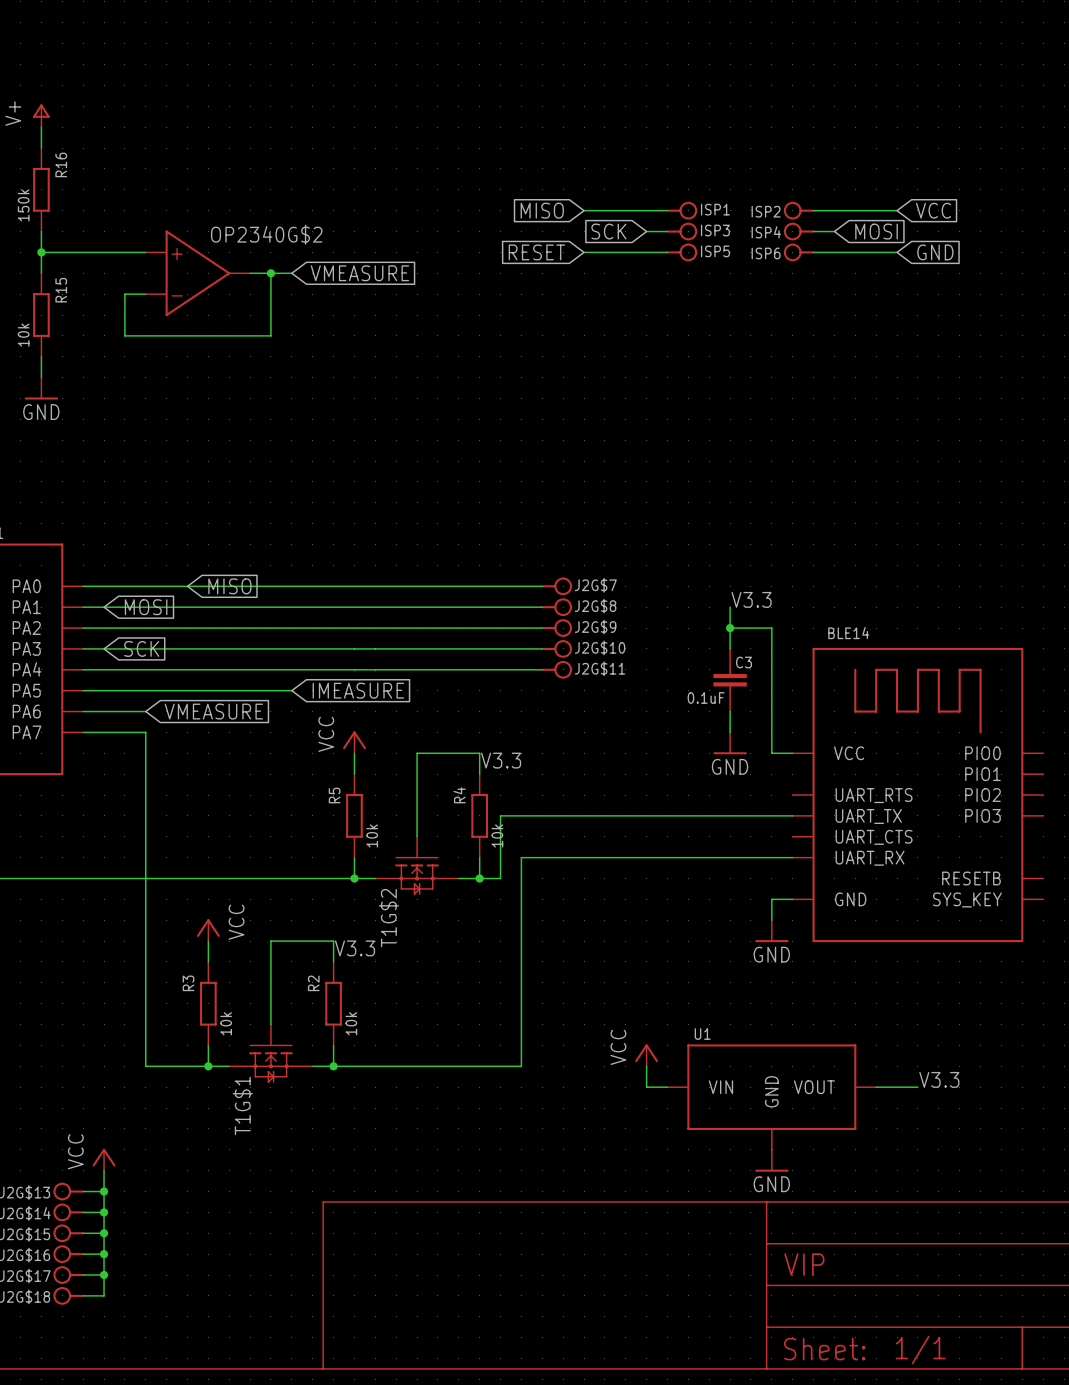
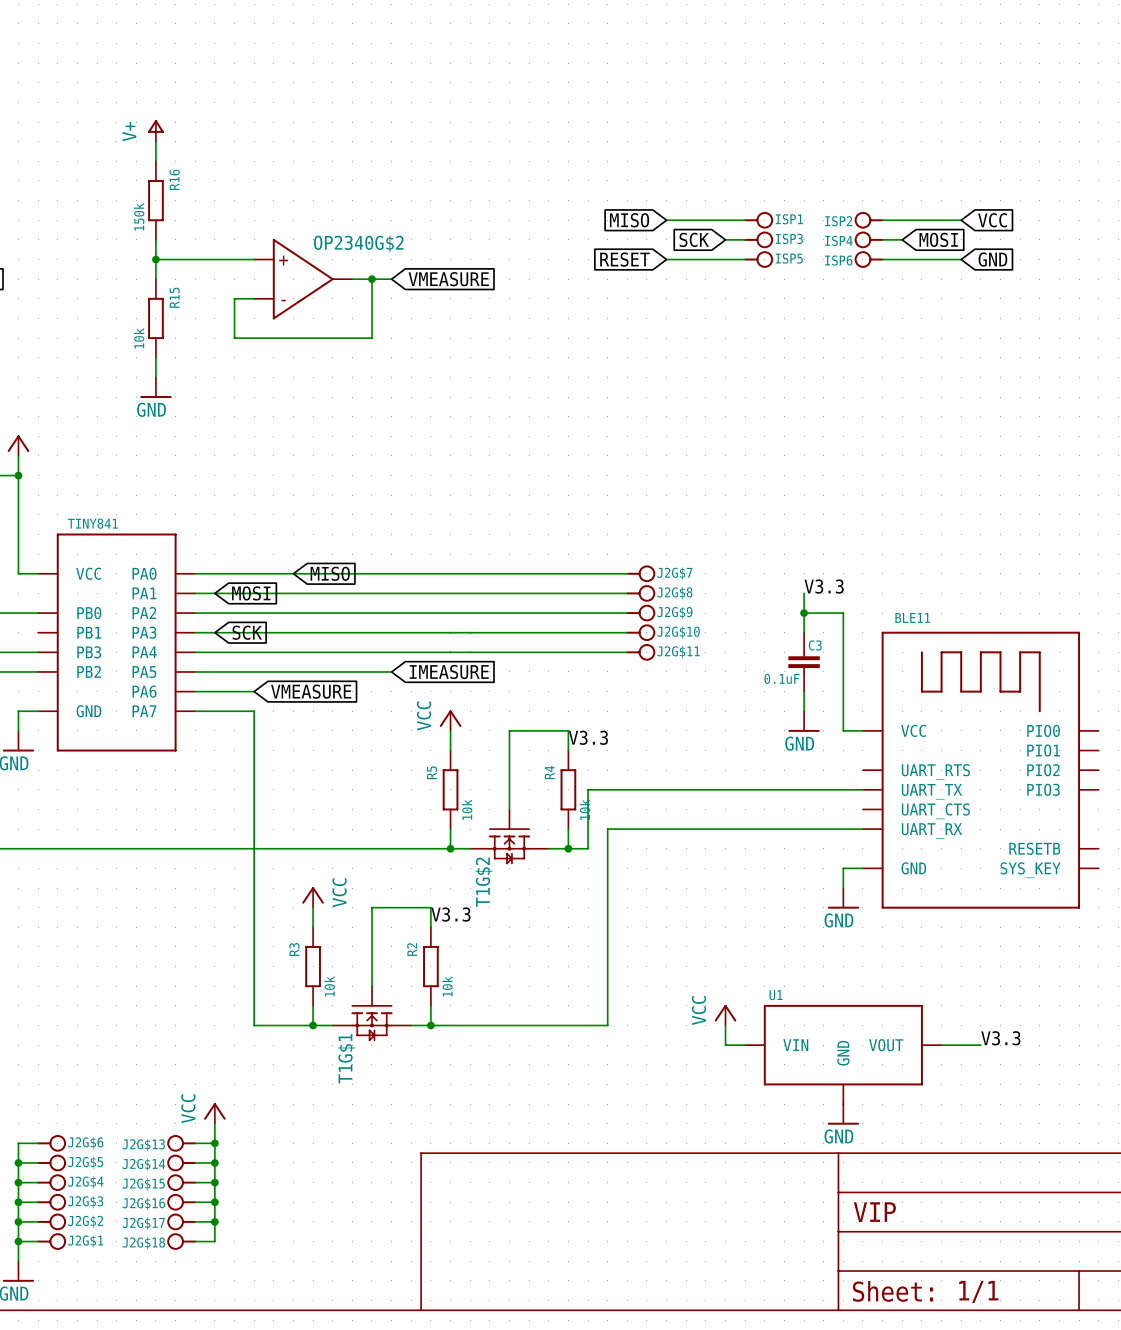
BLE14 name: BLE14 (848, 633) -> BLE11 (912, 617)

